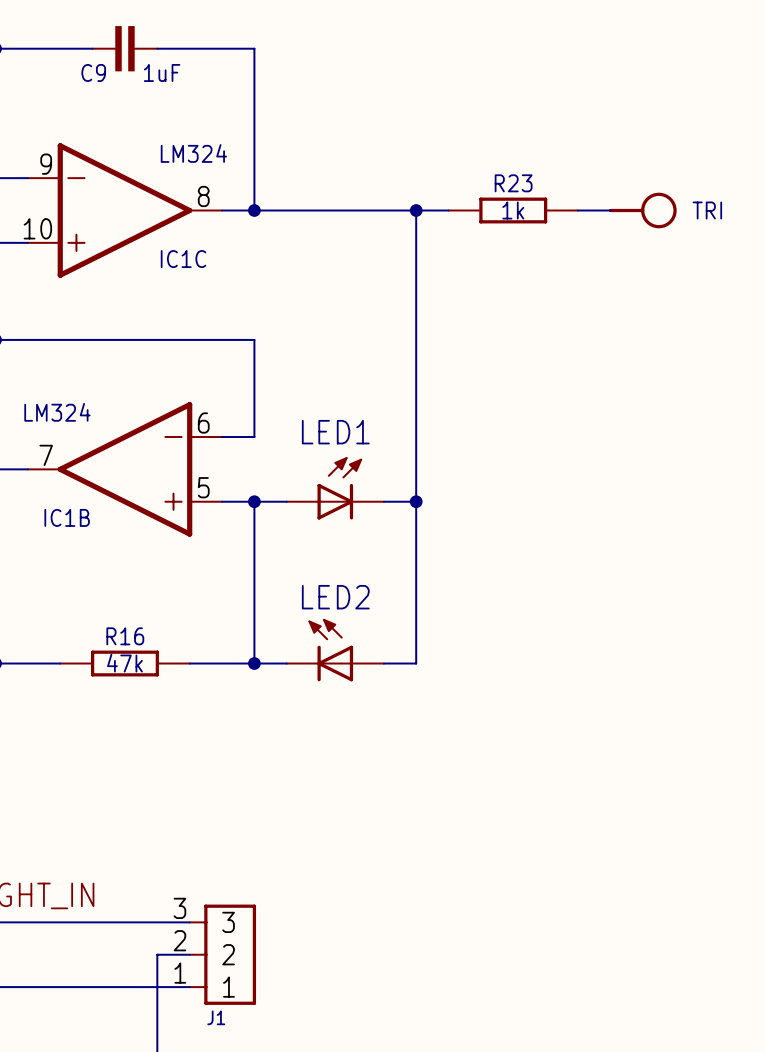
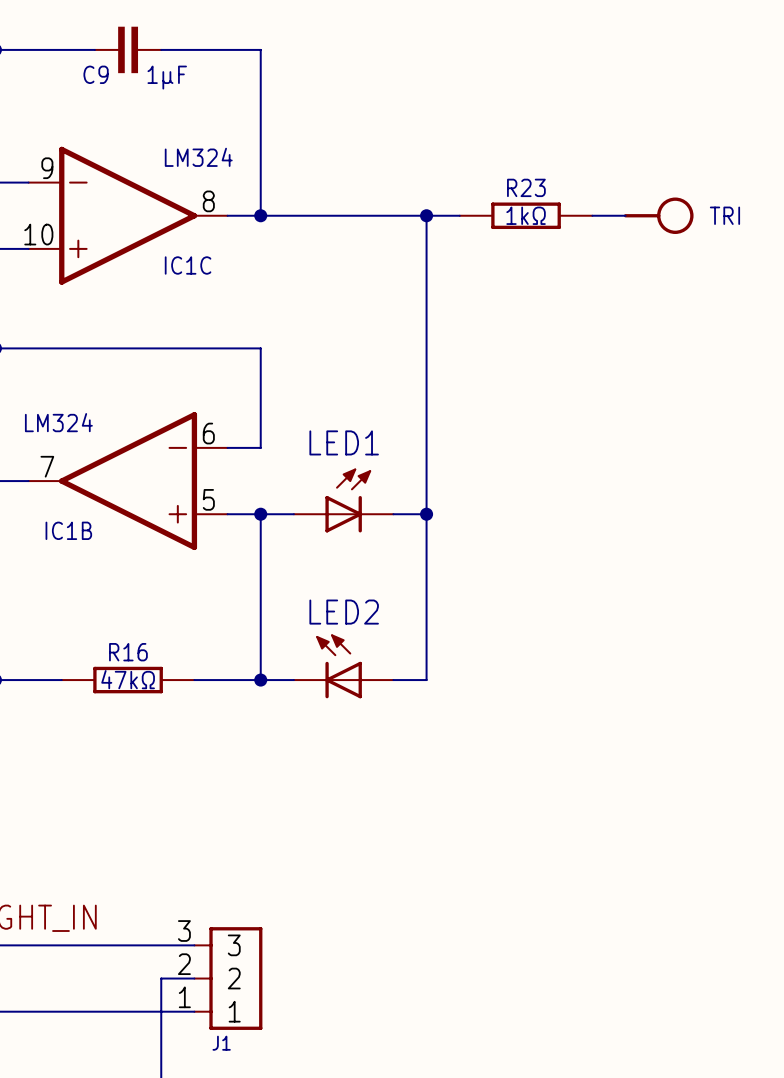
C9 value: 1uF (162, 72) -> 1μF (167, 77)
R23 value: 1k (513, 210) -> 1kΩ (526, 215)
R16 value: 47k (124, 663) -> 47kΩ (128, 679)

